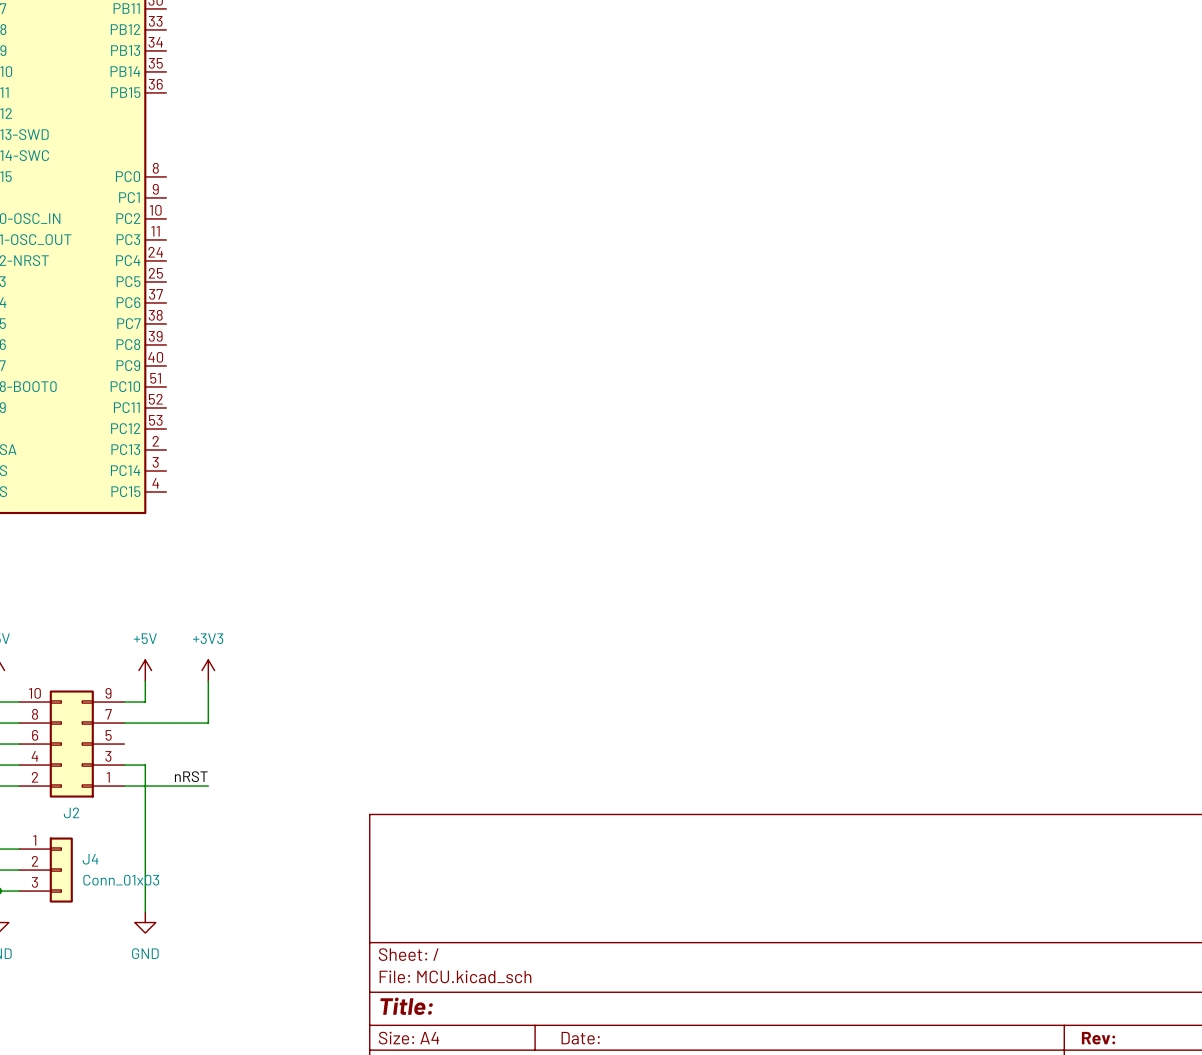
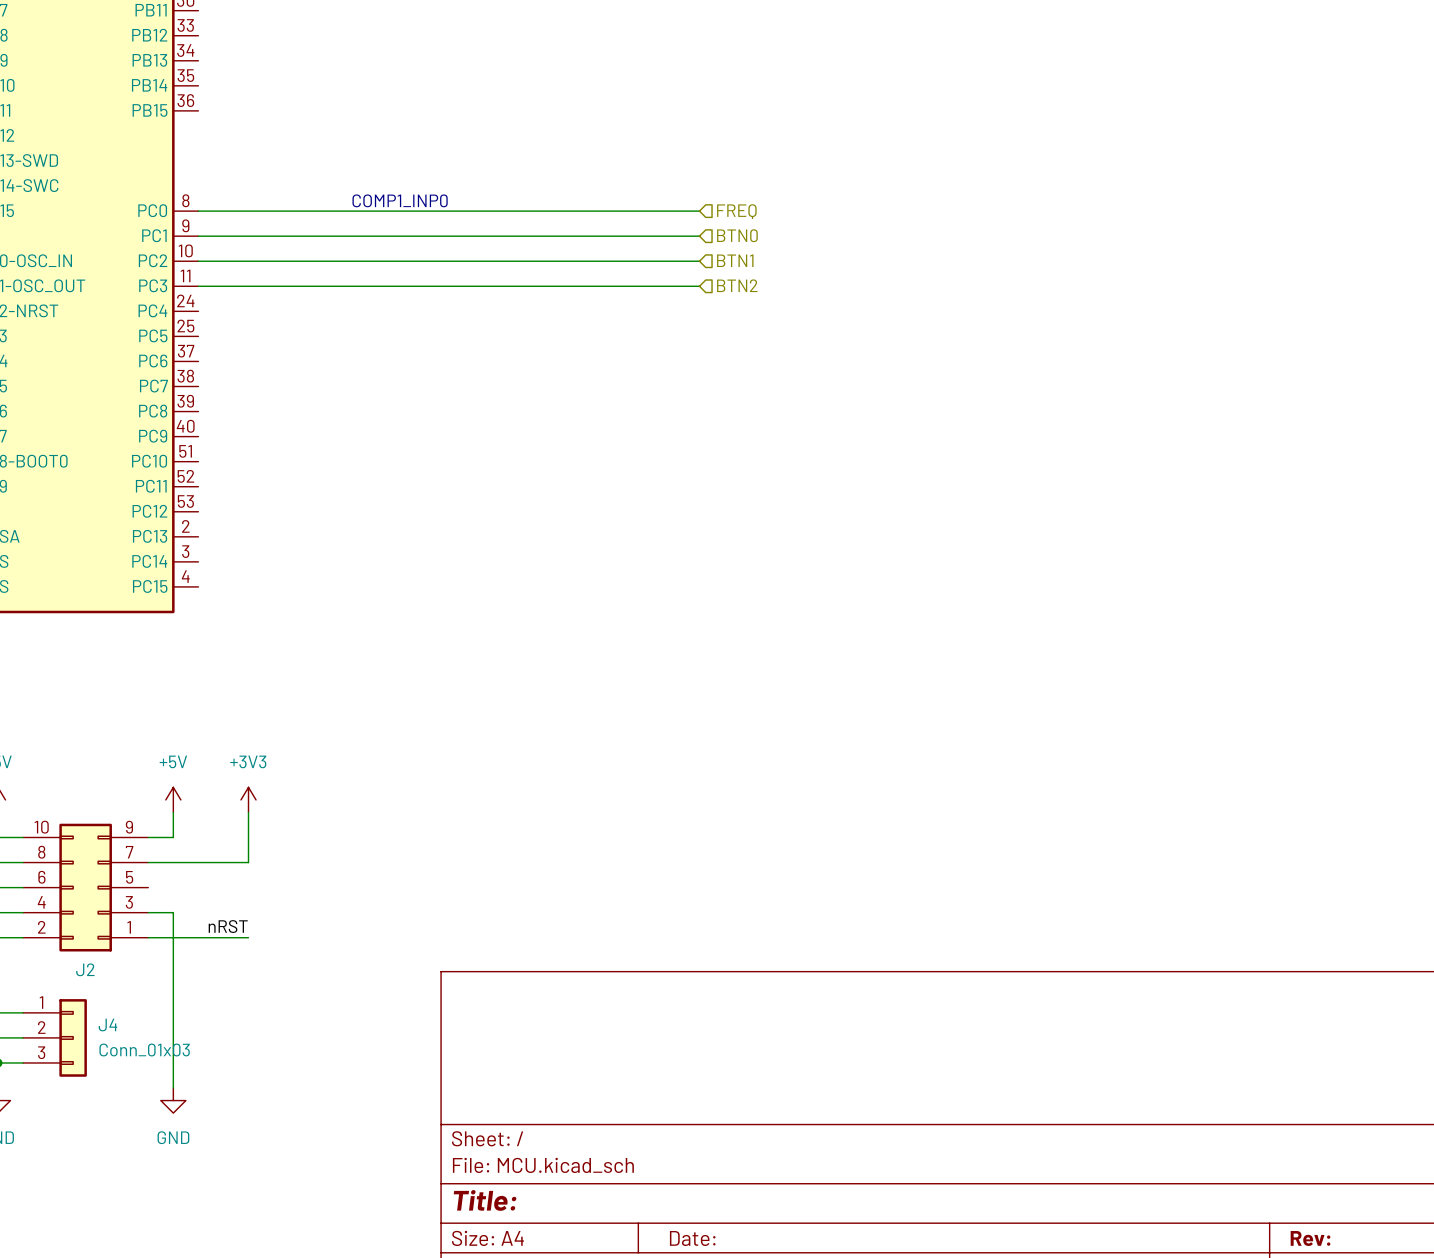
text: none -> COMP1_INP0 (400, 200)
wire: none -> (198, 211) (699, 211)
hierarchical label: none -> FREQ (736, 211)
wire: none -> (198, 236) (699, 236)
hierarchical label: none -> BTN0 (737, 235)
wire: none -> (198, 261) (699, 261)
hierarchical label: none -> BTN1 (735, 260)
wire: none -> (198, 286) (699, 286)
hierarchical label: none -> BTN2 (737, 285)

